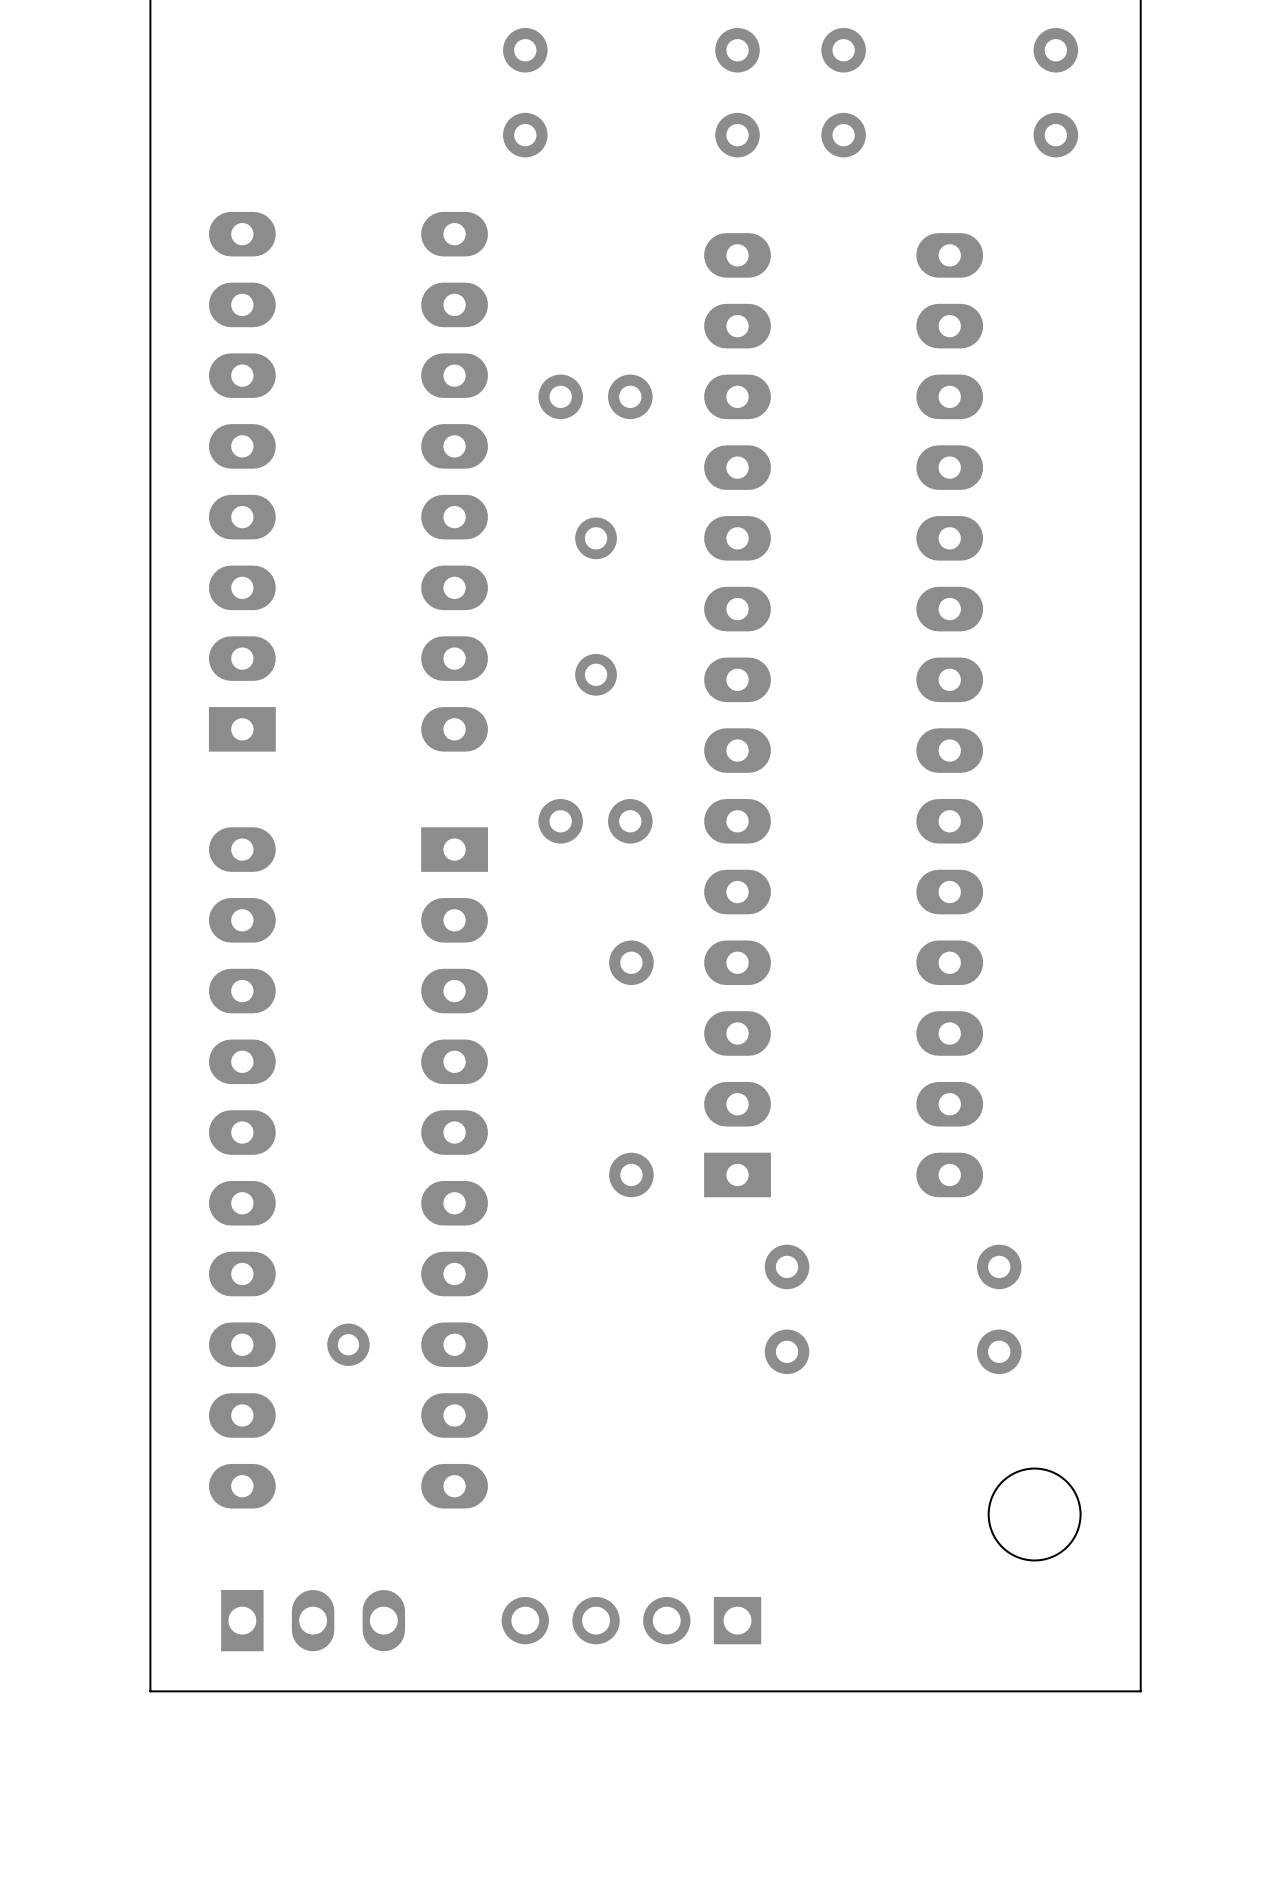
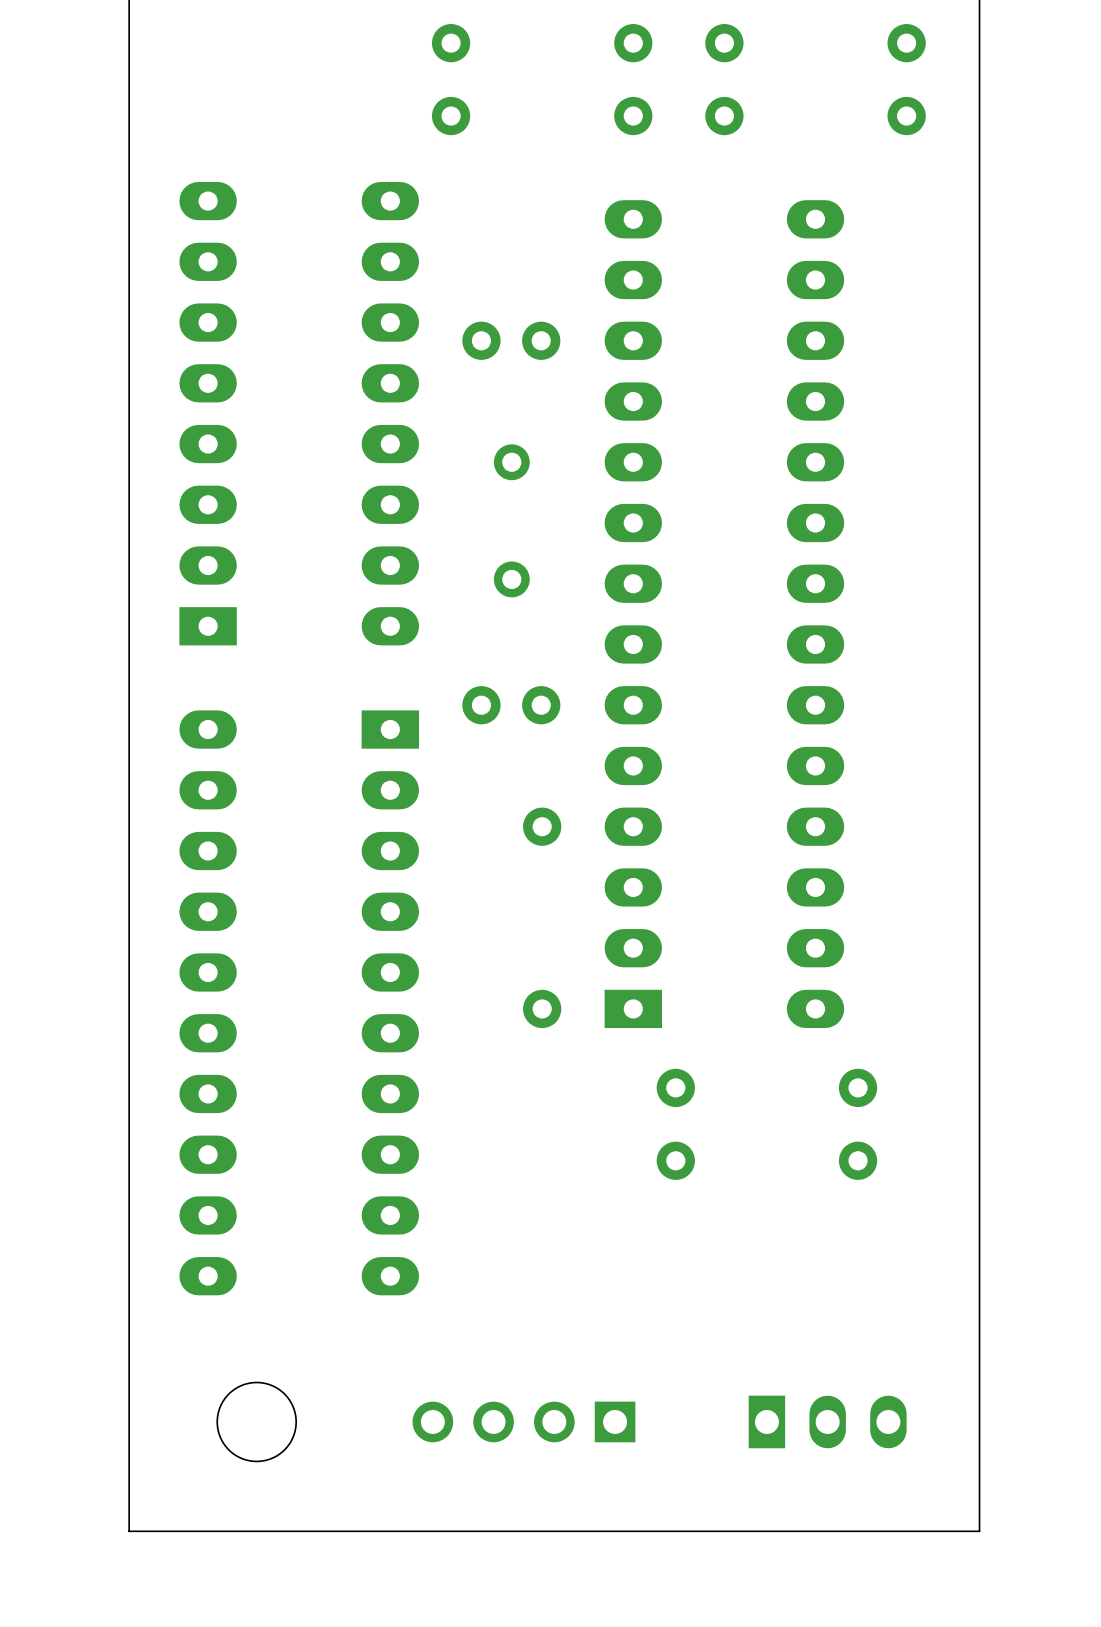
part: (348, 1344) -> none
round board edge: [987, 1467, 1082, 1562] -> none
round board edge: none -> [216, 1381, 297, 1463]
part position: (313, 1620) -> (827, 1421)
part position: (631, 1620) -> (523, 1421)
board edge: (1140, 1691) (150, 1691) -> (979, 1452) (979, 1531) (129, 1531) (129, 1452)

